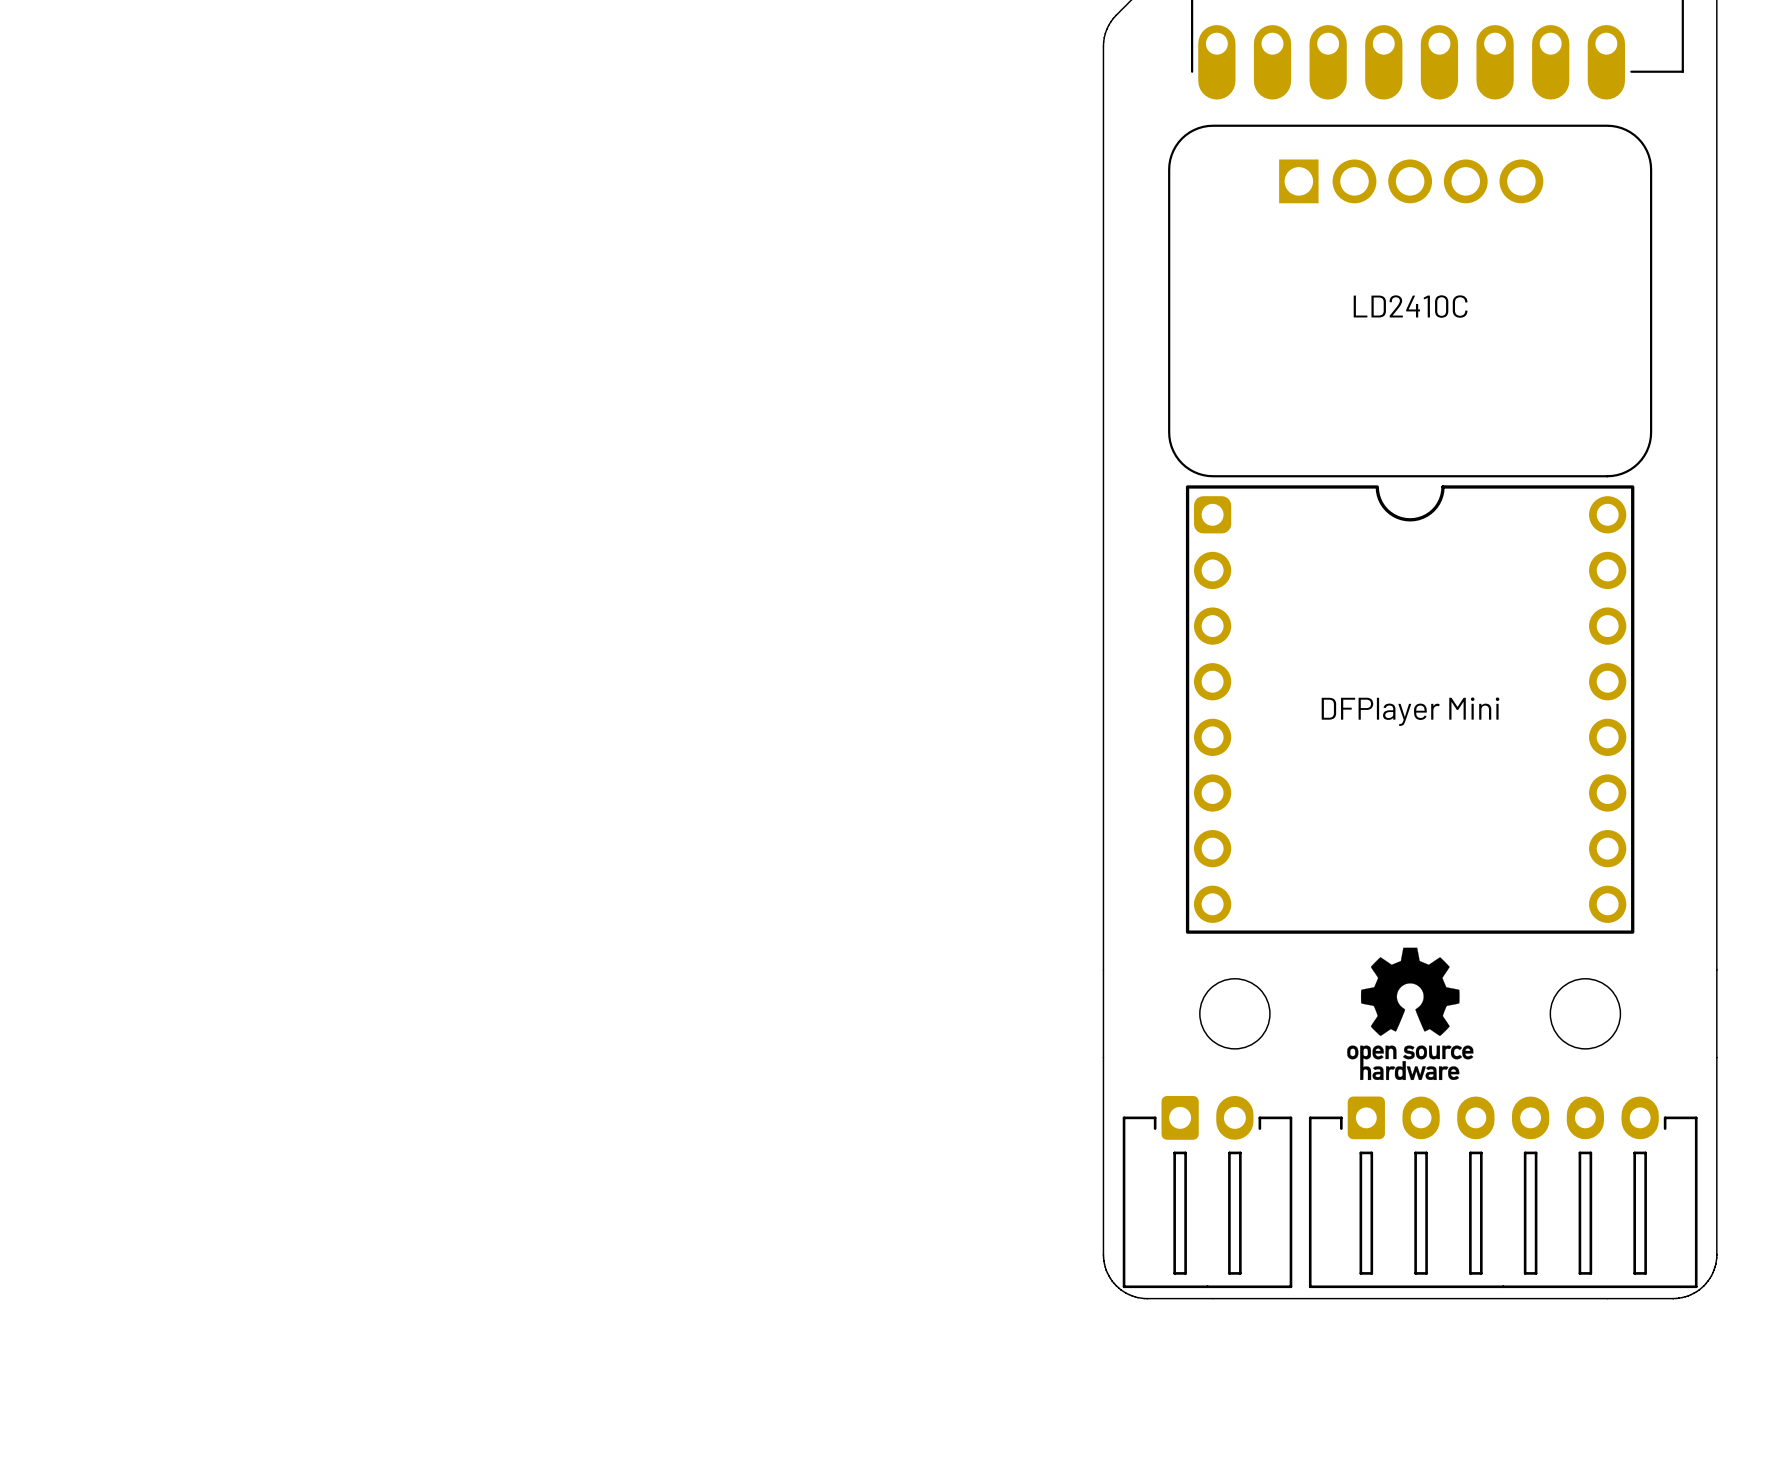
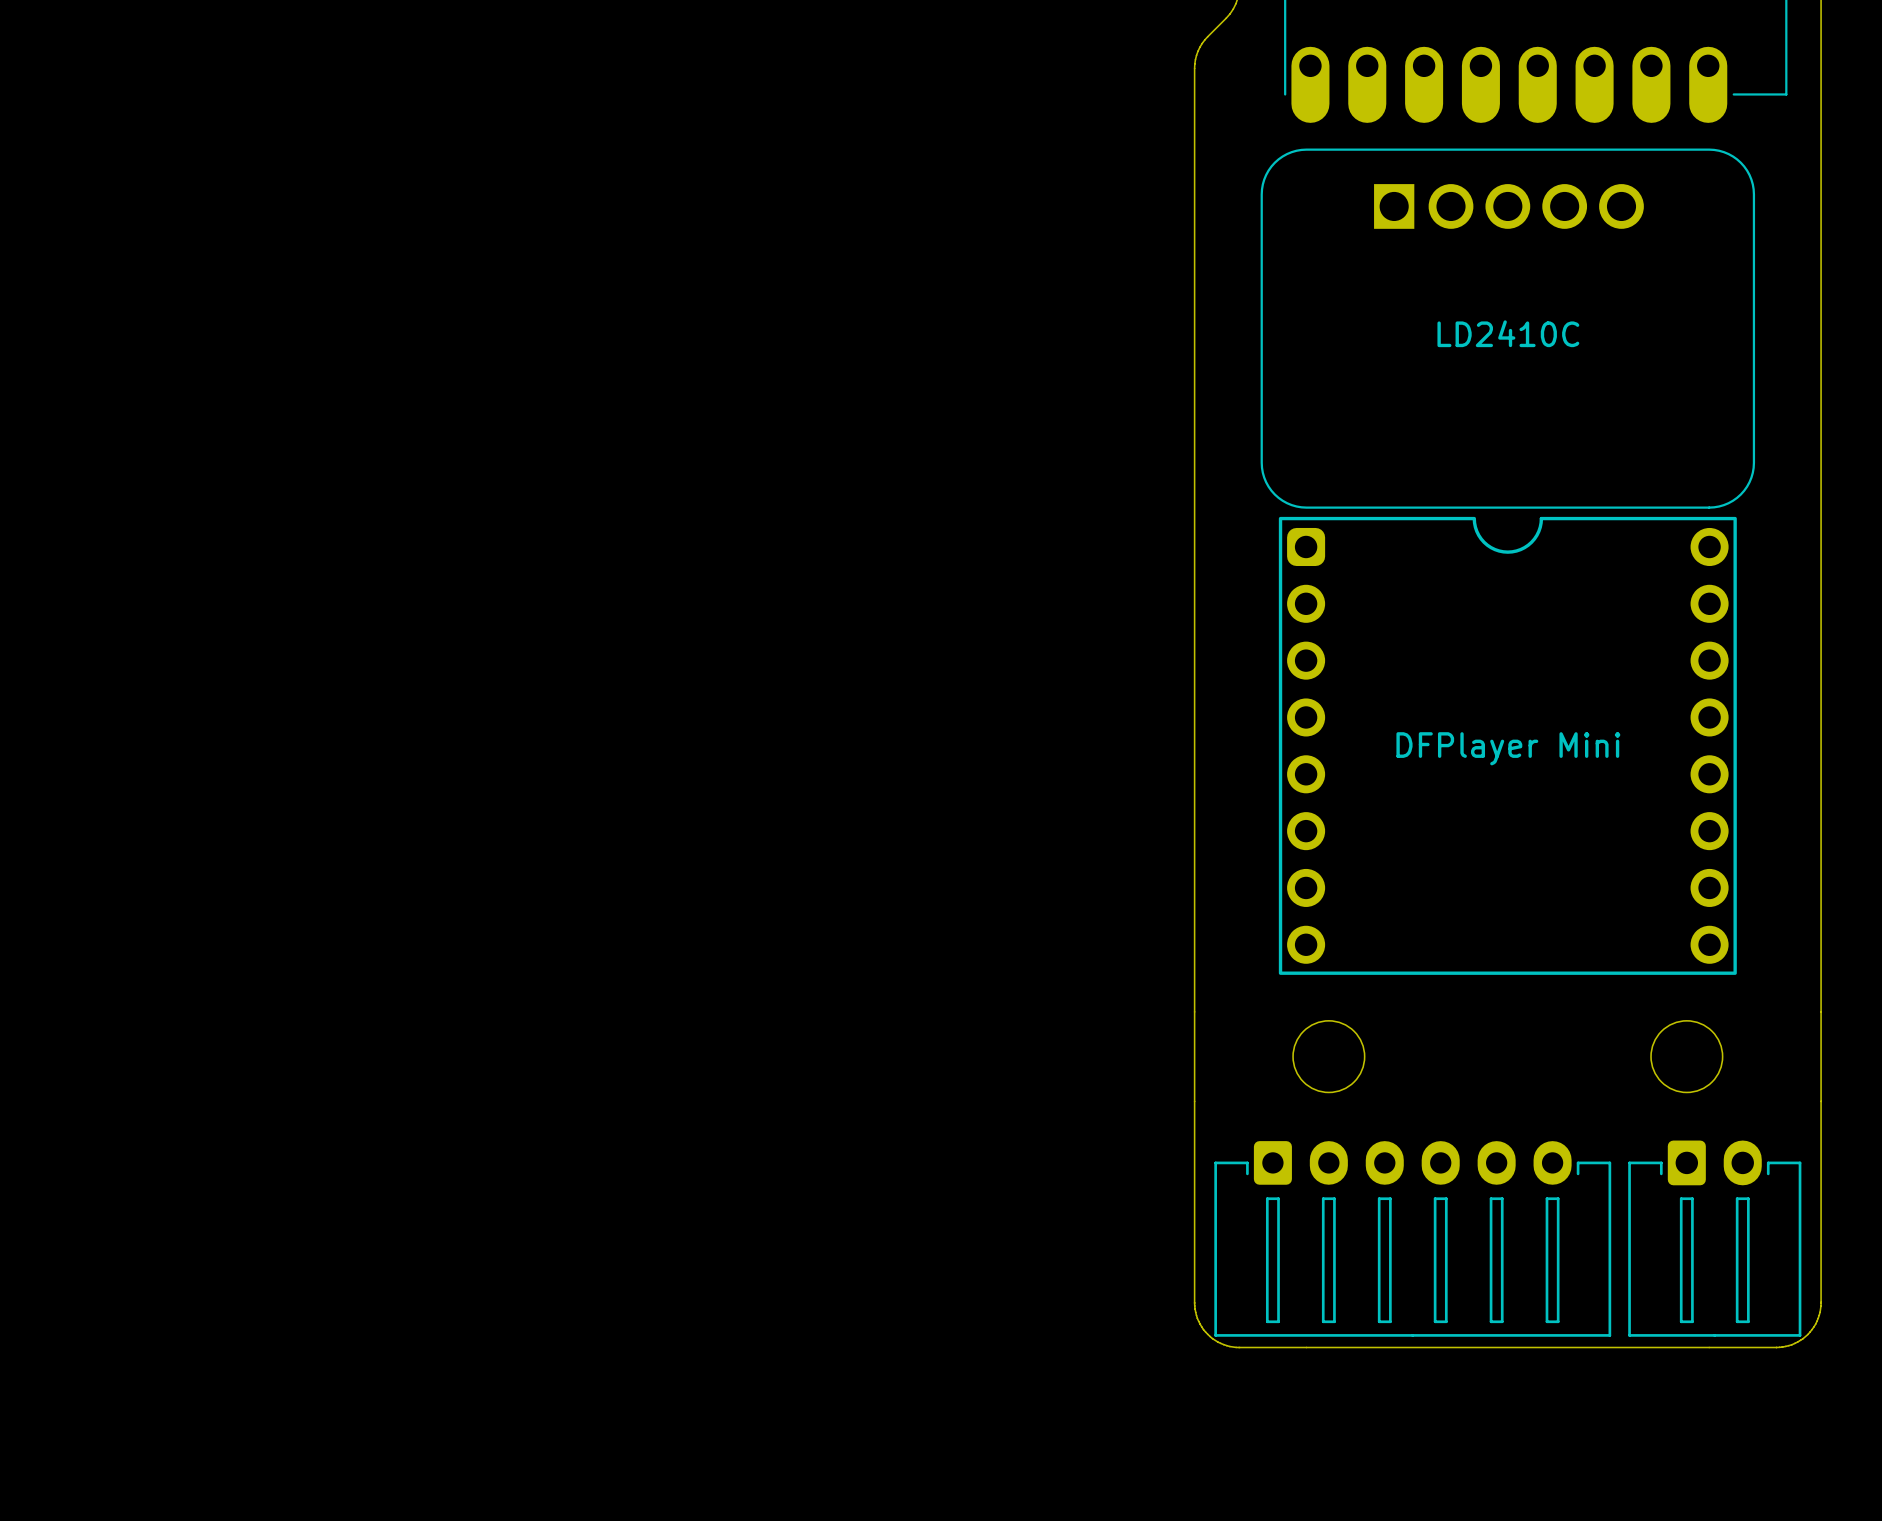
drawing: [1347, 947, 1474, 1081] -> none
part position: (1207, 1192) -> (1714, 1238)
part position: (1503, 1192) -> (1412, 1238)

